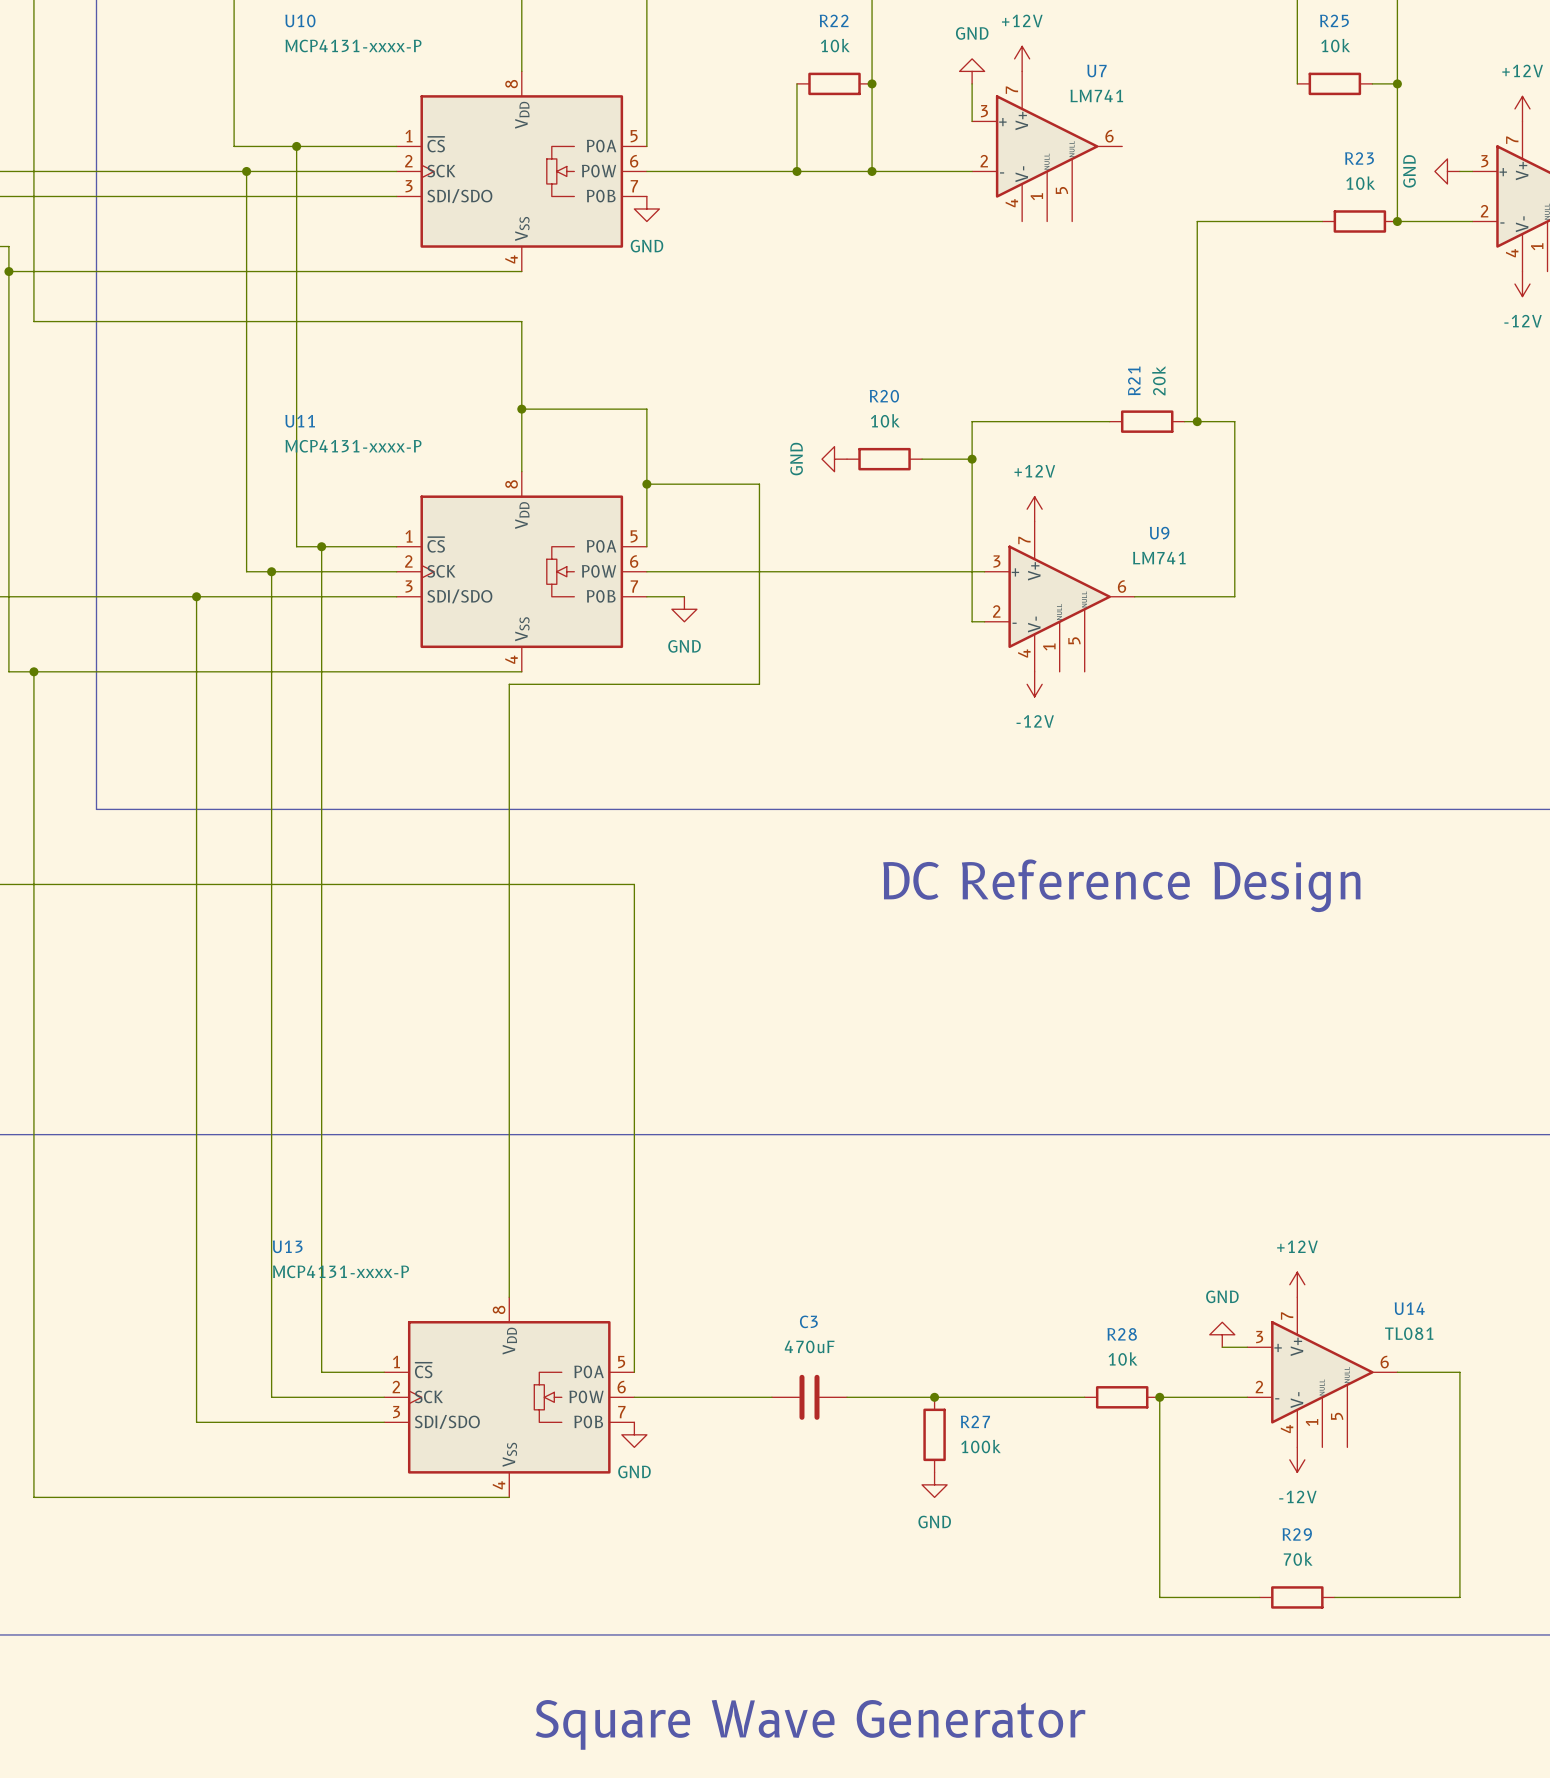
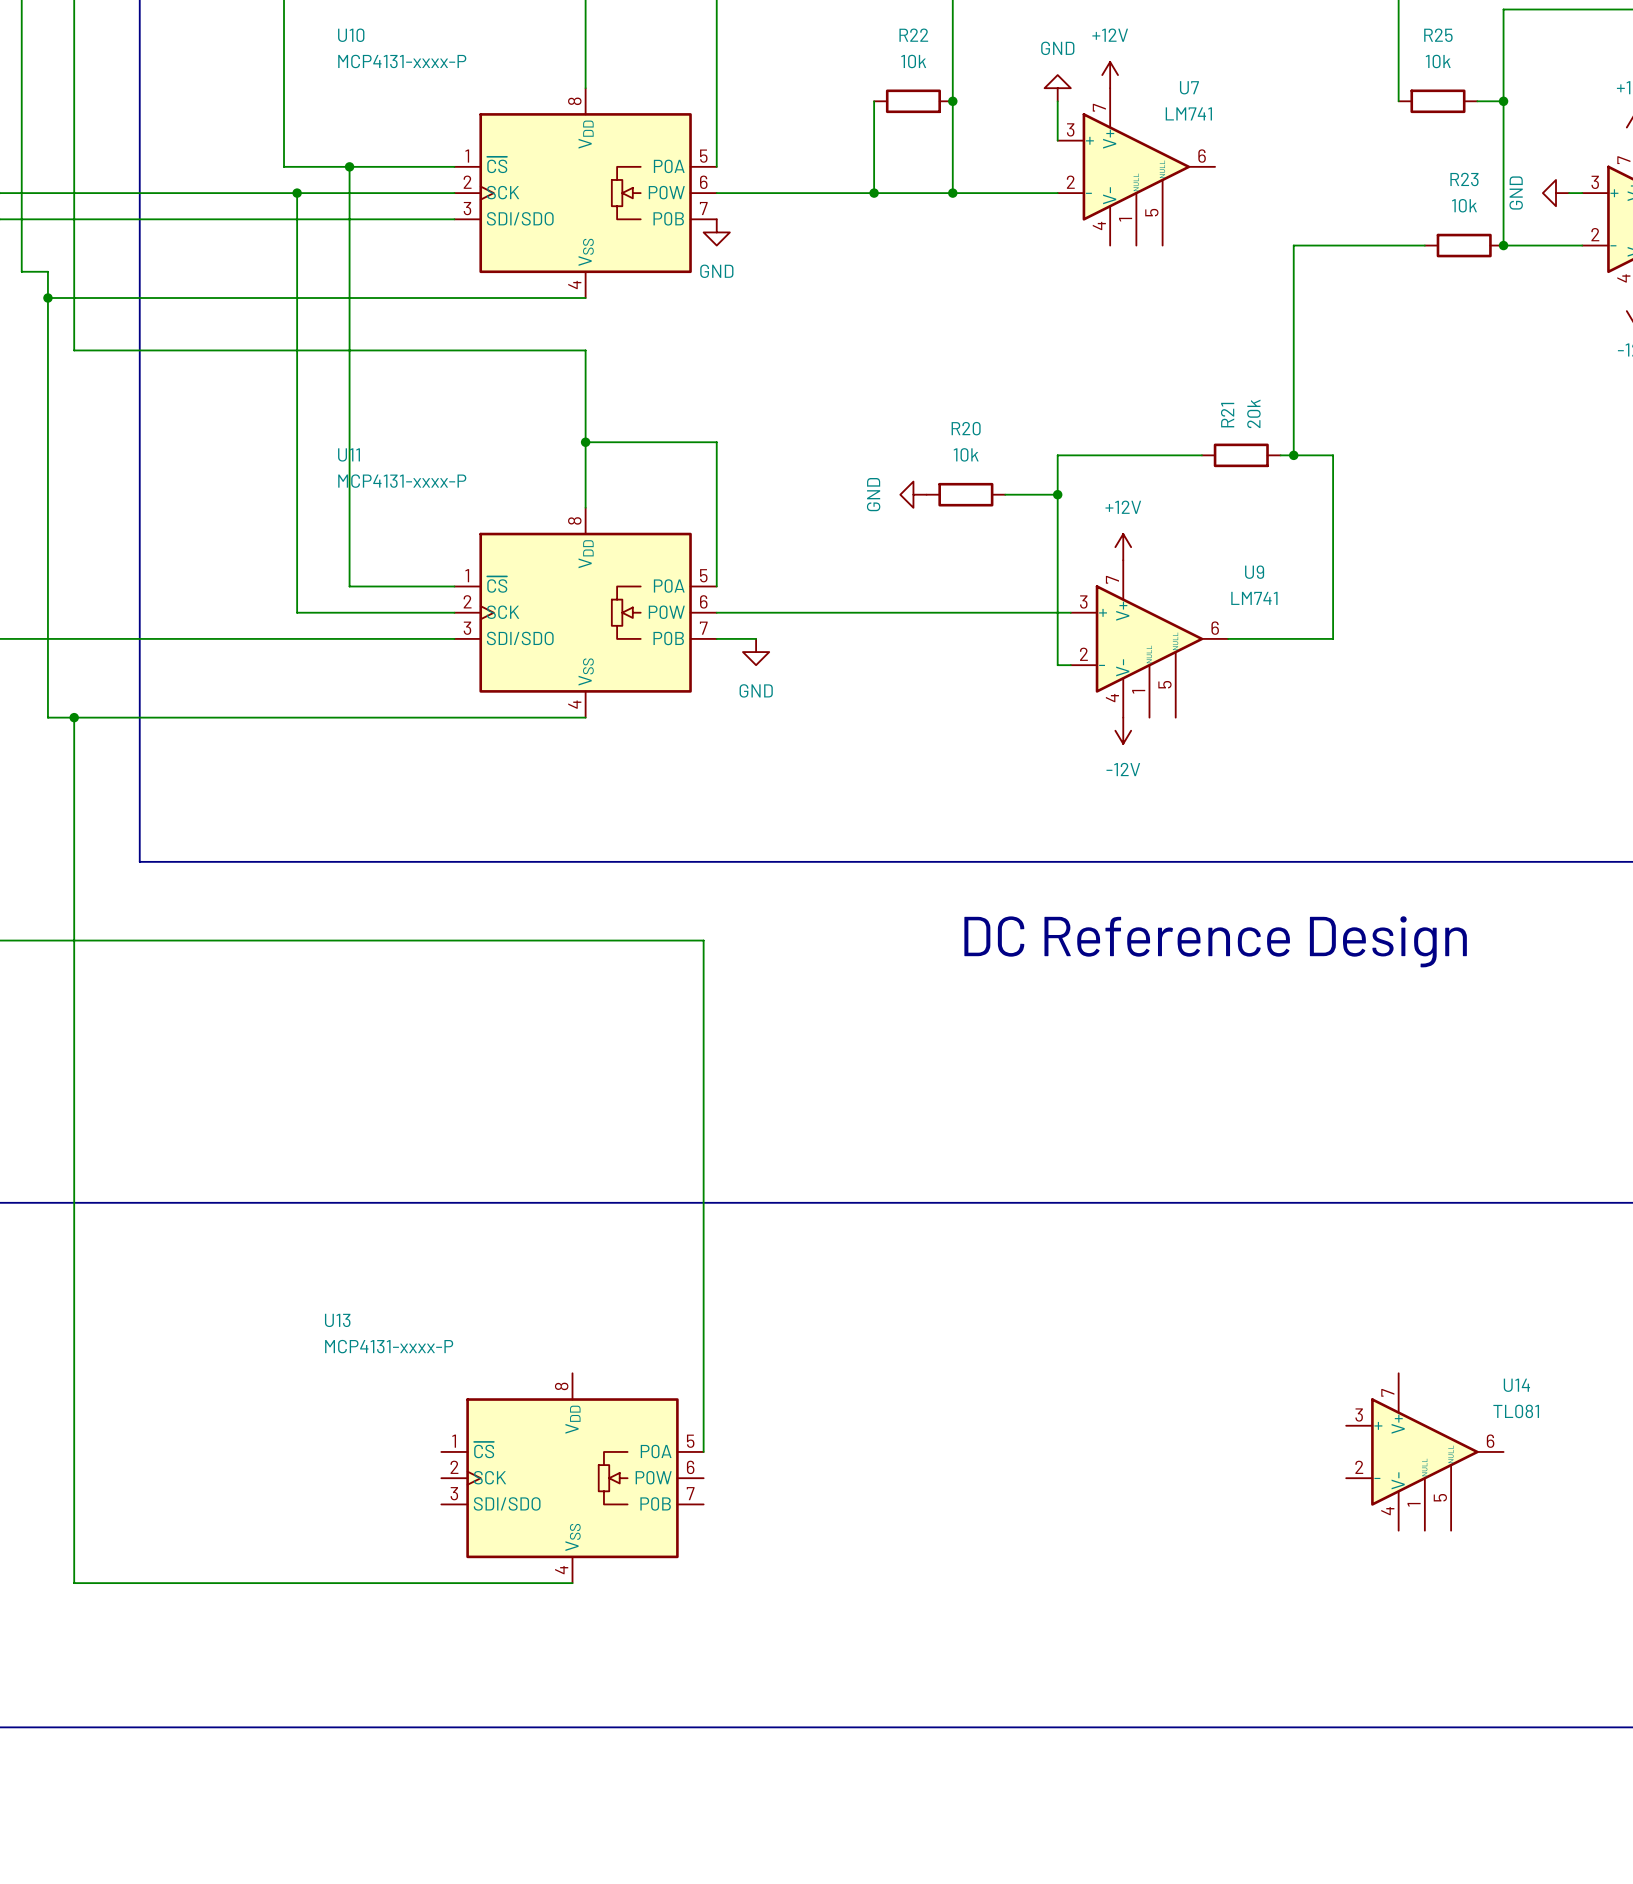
wire: (646, 484) (759, 484) (759, 684) (509, 684) (509, 1297) -> none
junction: (646, 484) -> none
wire: (321, 546) (321, 1372) (384, 1372) -> none
junction: (321, 546) -> none
wire: (271, 571) (271, 1397) (384, 1397) -> none
junction: (271, 571) -> none
wire: (196, 596) (196, 1422) (384, 1422) -> none
junction: (196, 596) -> none
power symbol: +12V (1297, 1284) -> none
power symbol: GND (1222, 1334) -> none
wire: (1222, 1347) (1247, 1347) -> none
wire: (1397, 1372) (1459, 1372) (1459, 1597) (1334, 1597) -> none
wire: (634, 1397) (771, 1397) -> none
C3: 470uF (809, 1397) -> none
wire: (847, 1397) (1084, 1397) -> none
junction: (934, 1397) -> none
R28: 10k (1122, 1397) -> none
junction: (1159, 1397) -> none
wire: (1247, 1397) (1159, 1397) (1159, 1597) (1259, 1597) -> none
power symbol: GND (634, 1434) -> none
R27: 100k (934, 1434) -> none
power symbol: -12V (1297, 1459) -> none
power symbol: GND (934, 1484) -> none
R29: 70k (1297, 1597) -> none
text: Square Wave Generator (810, 1724) -> none

